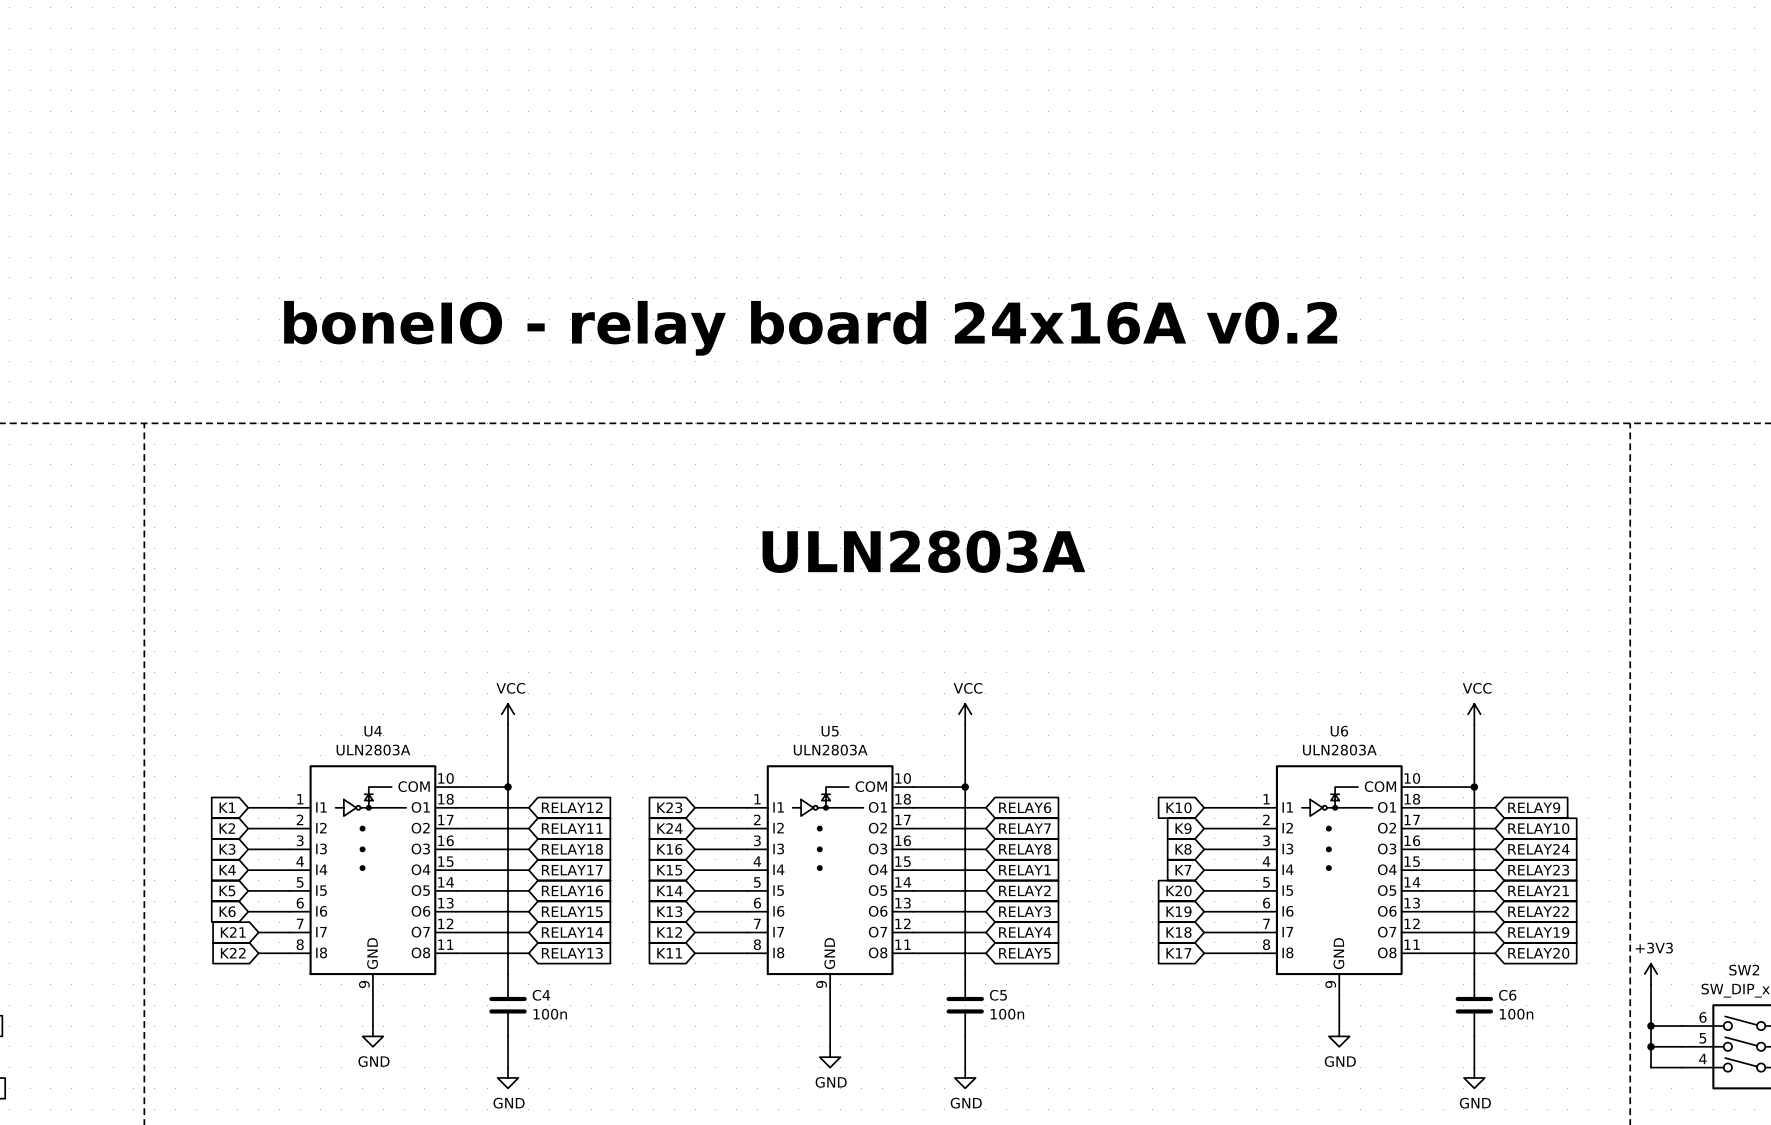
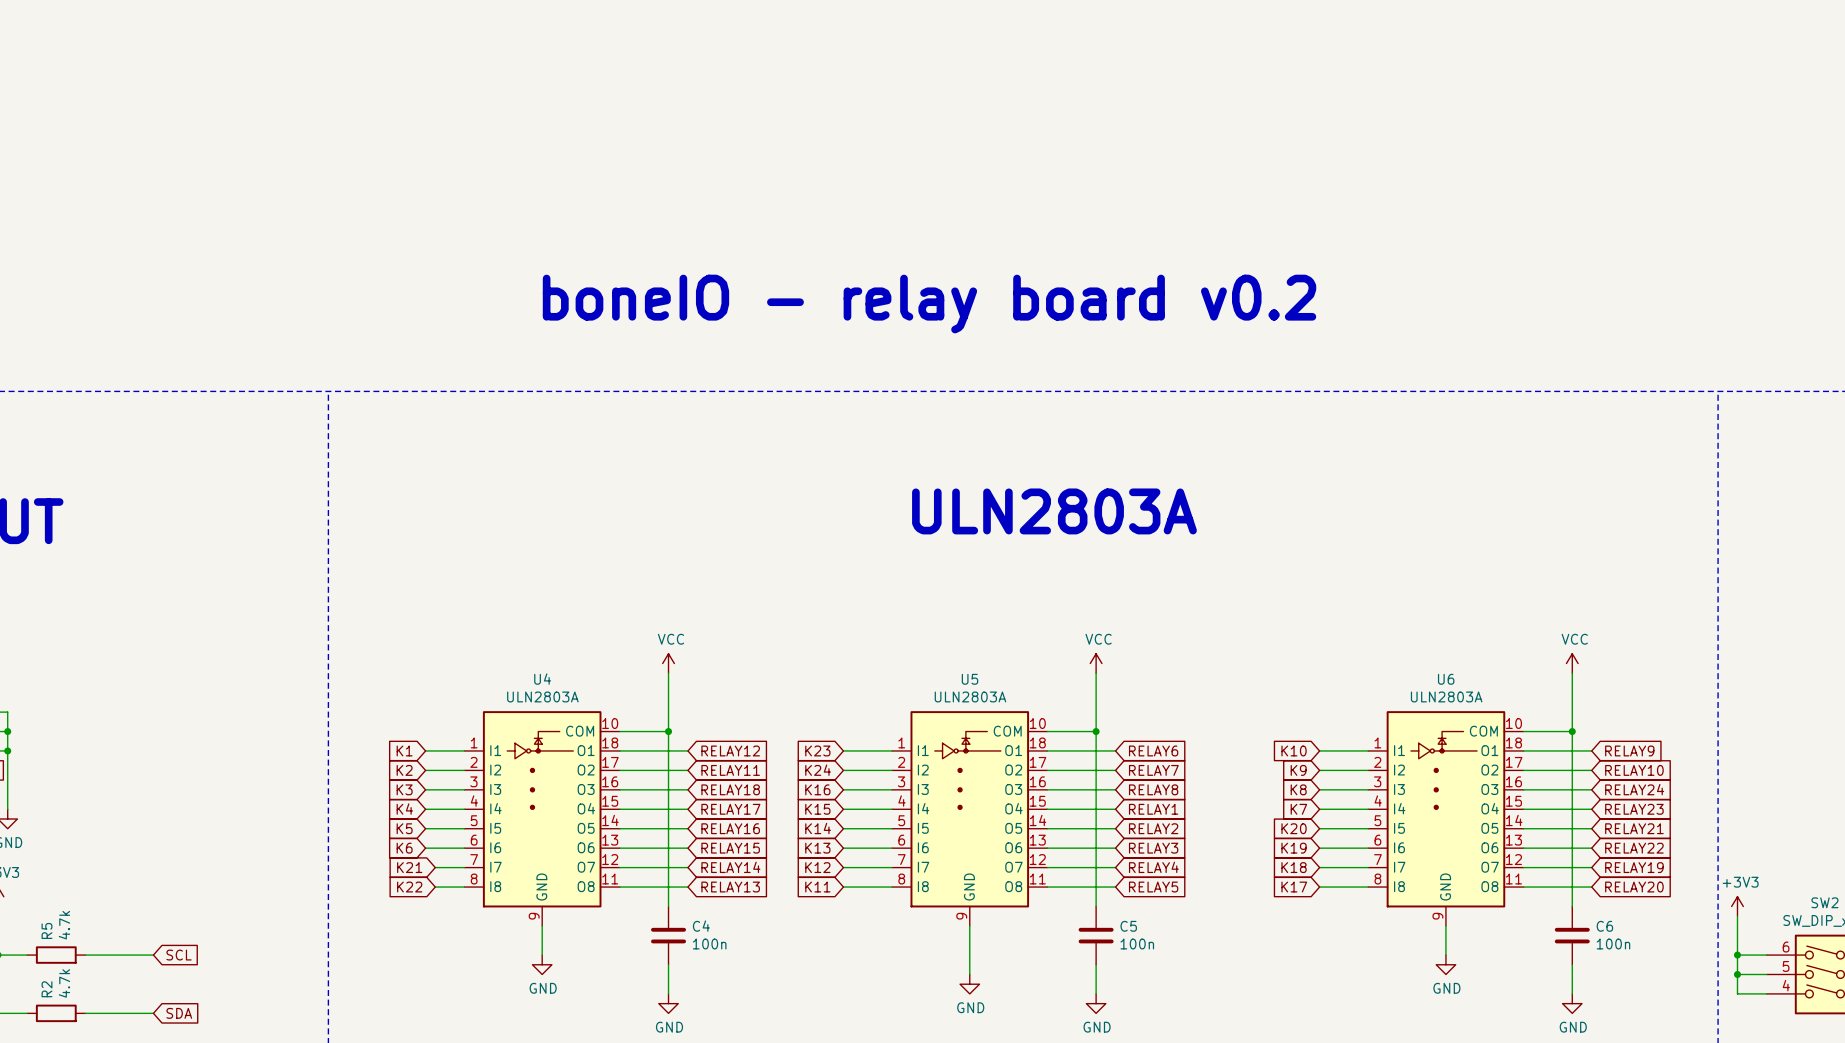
text: boneIO - relay board 24x16A v0.2 (810, 328) -> boneIO - relay board v0.2 (929, 304)

